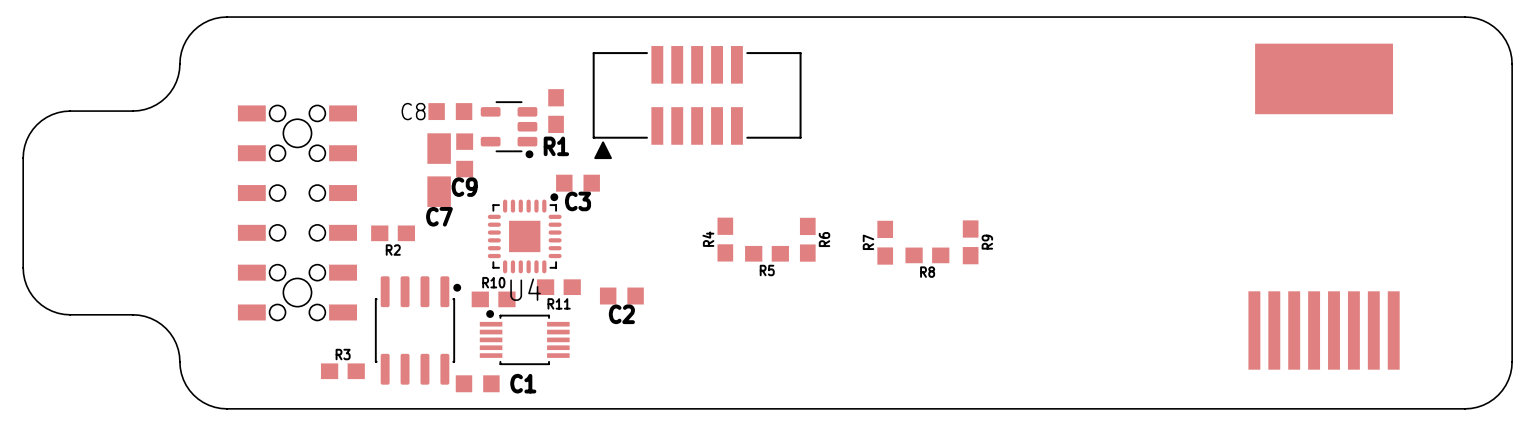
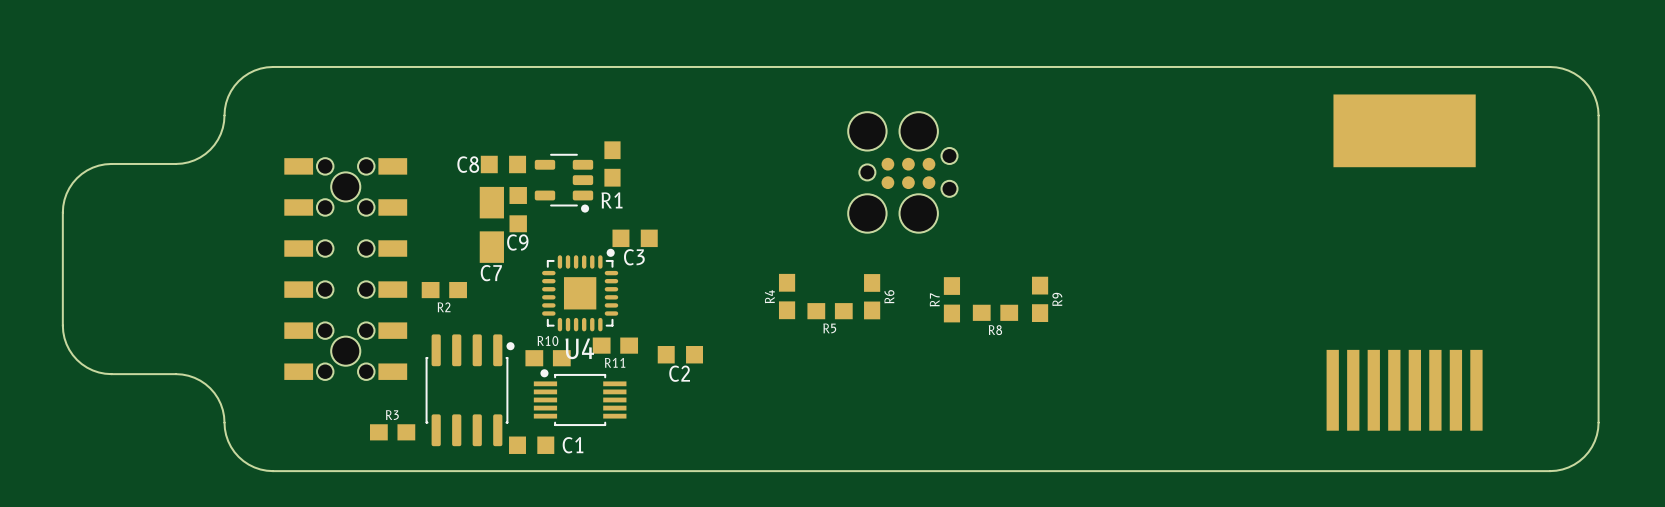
part: (697, 102) -> none
part: none -> (902, 172)

